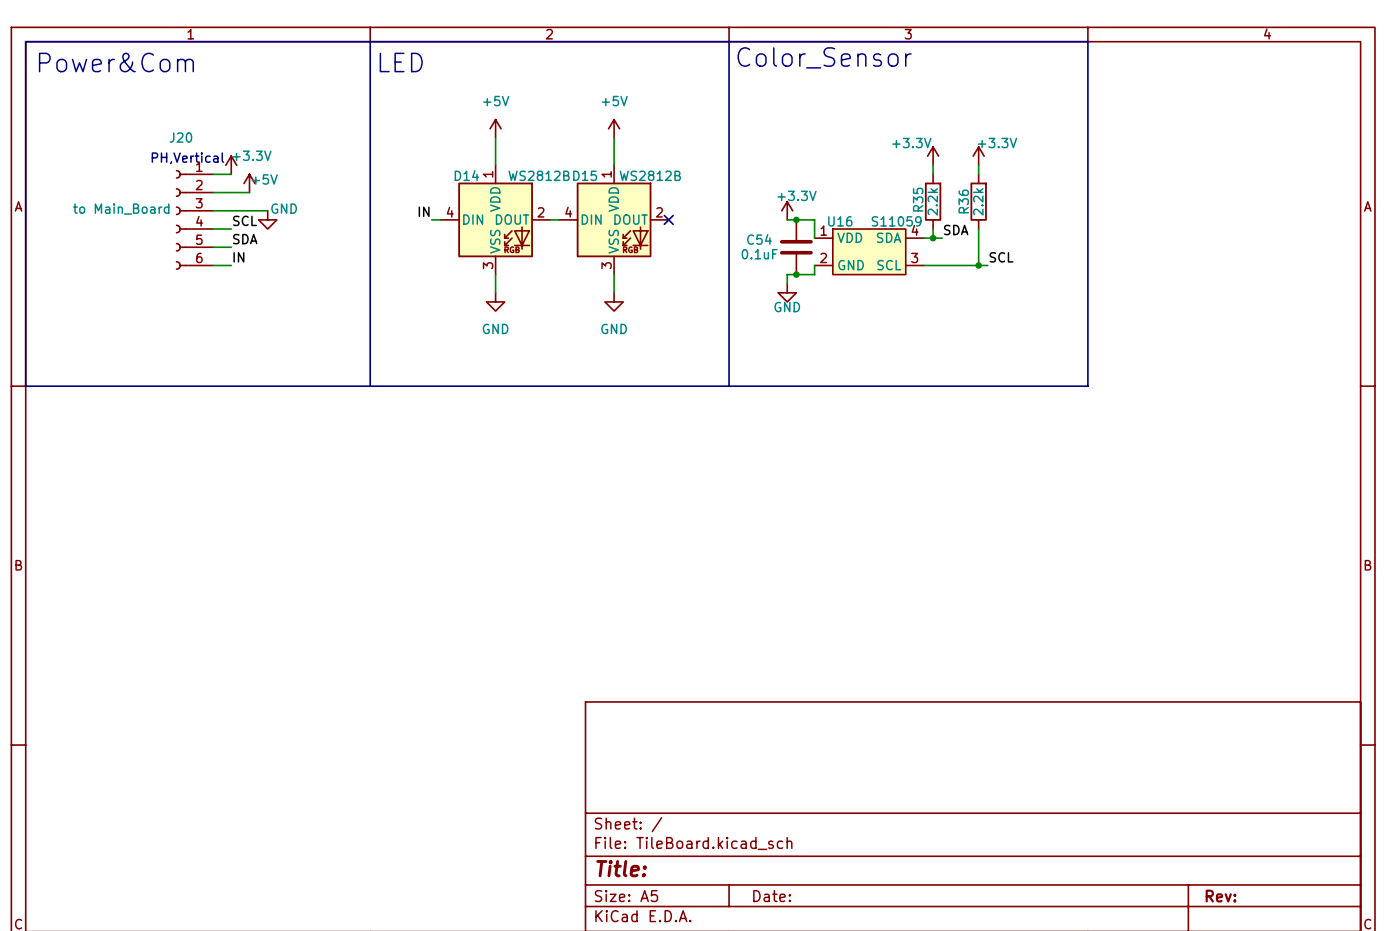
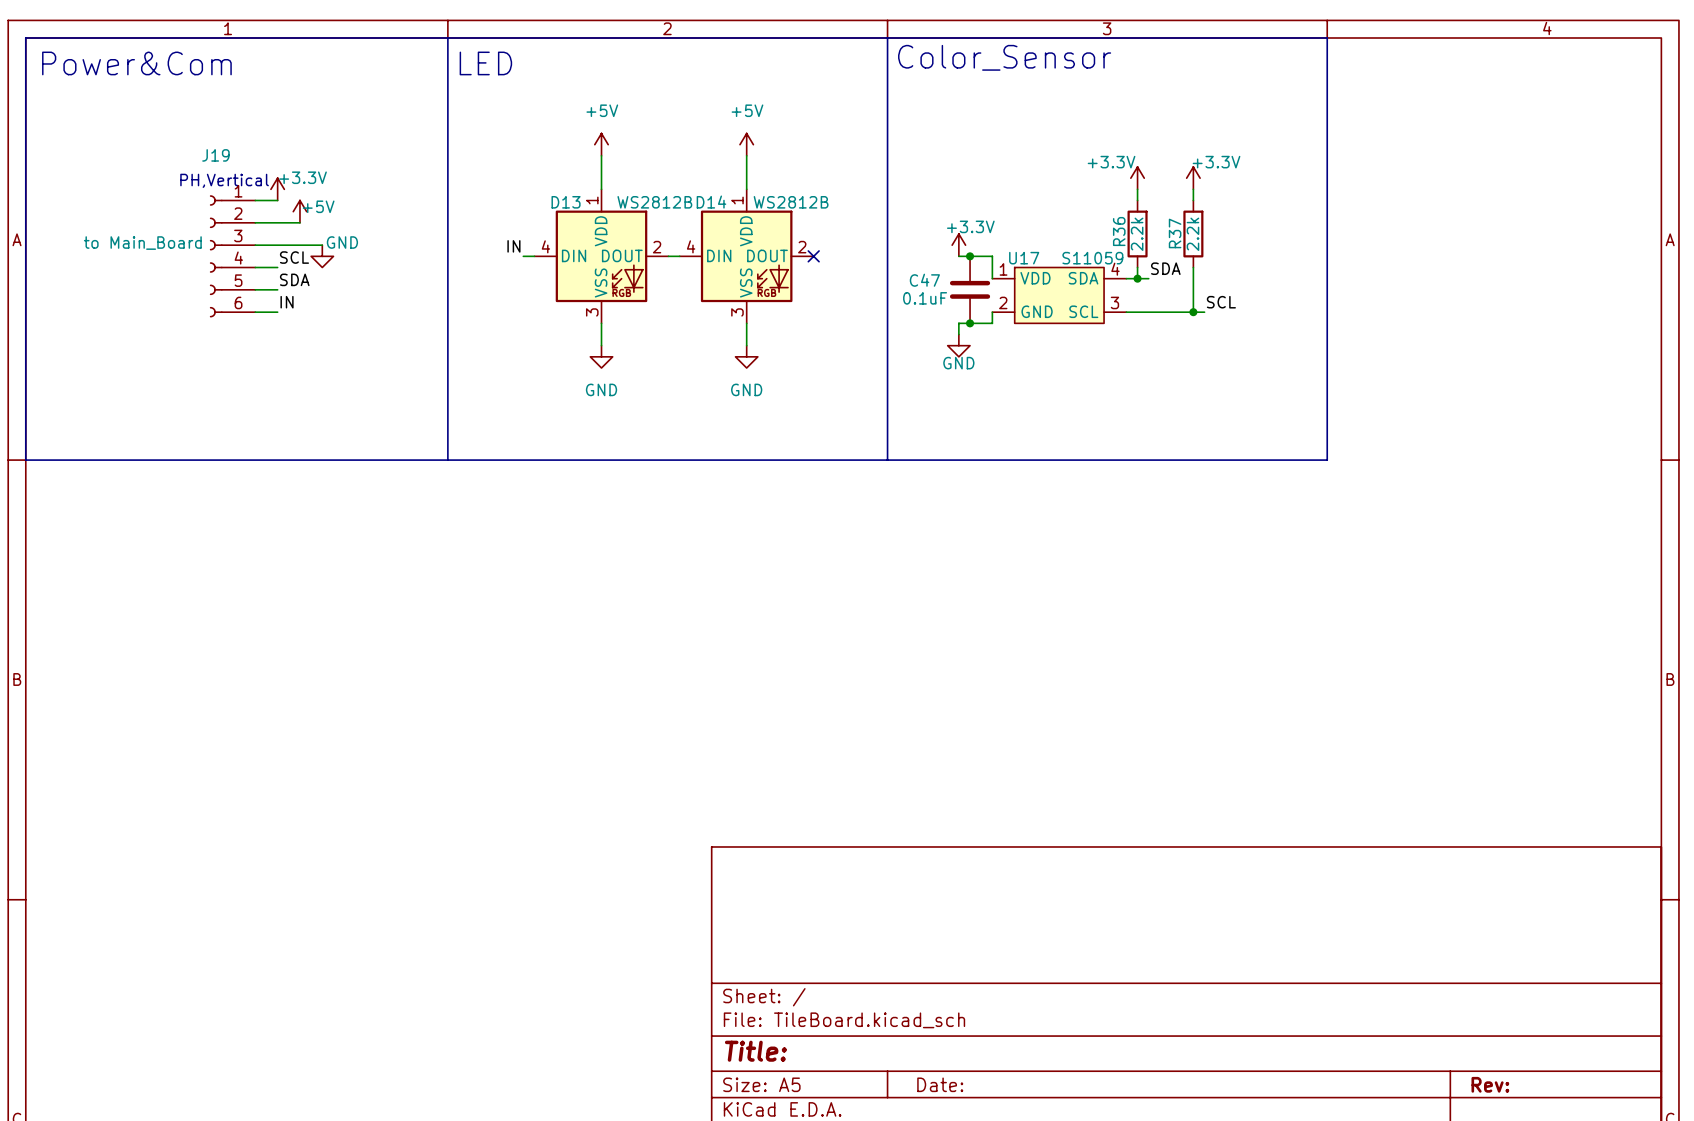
J20 name: J20 (180, 137) -> J19 (215, 155)
D14 name: D14 (466, 175) -> D13 (566, 202)
D15 name: D15 (585, 175) -> D14 (711, 202)
R35 name: R35 (918, 199) -> R36 (1119, 231)
R36 name: R36 (963, 201) -> R37 (1175, 233)
U16 name: U16 (840, 221) -> U17 (1024, 258)
C54 name: C54 (759, 239) -> C47 (924, 280)

